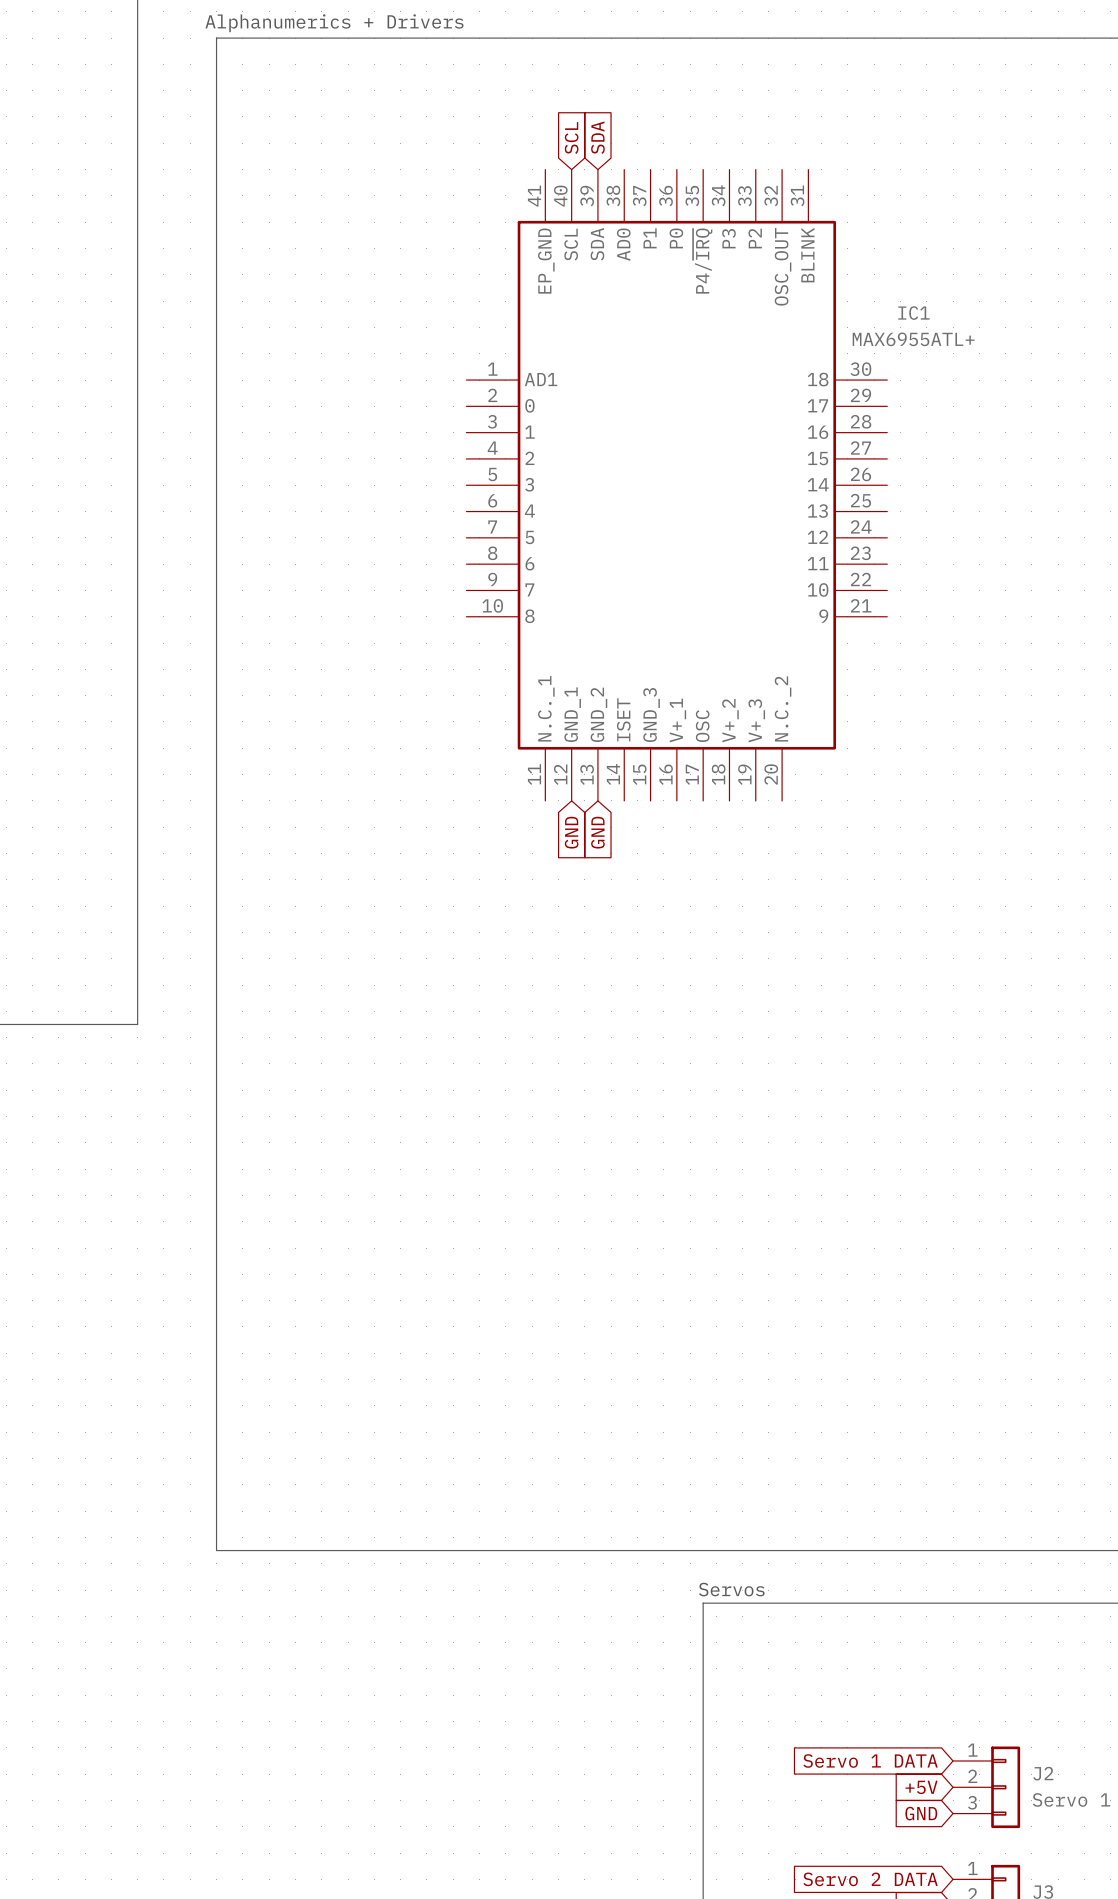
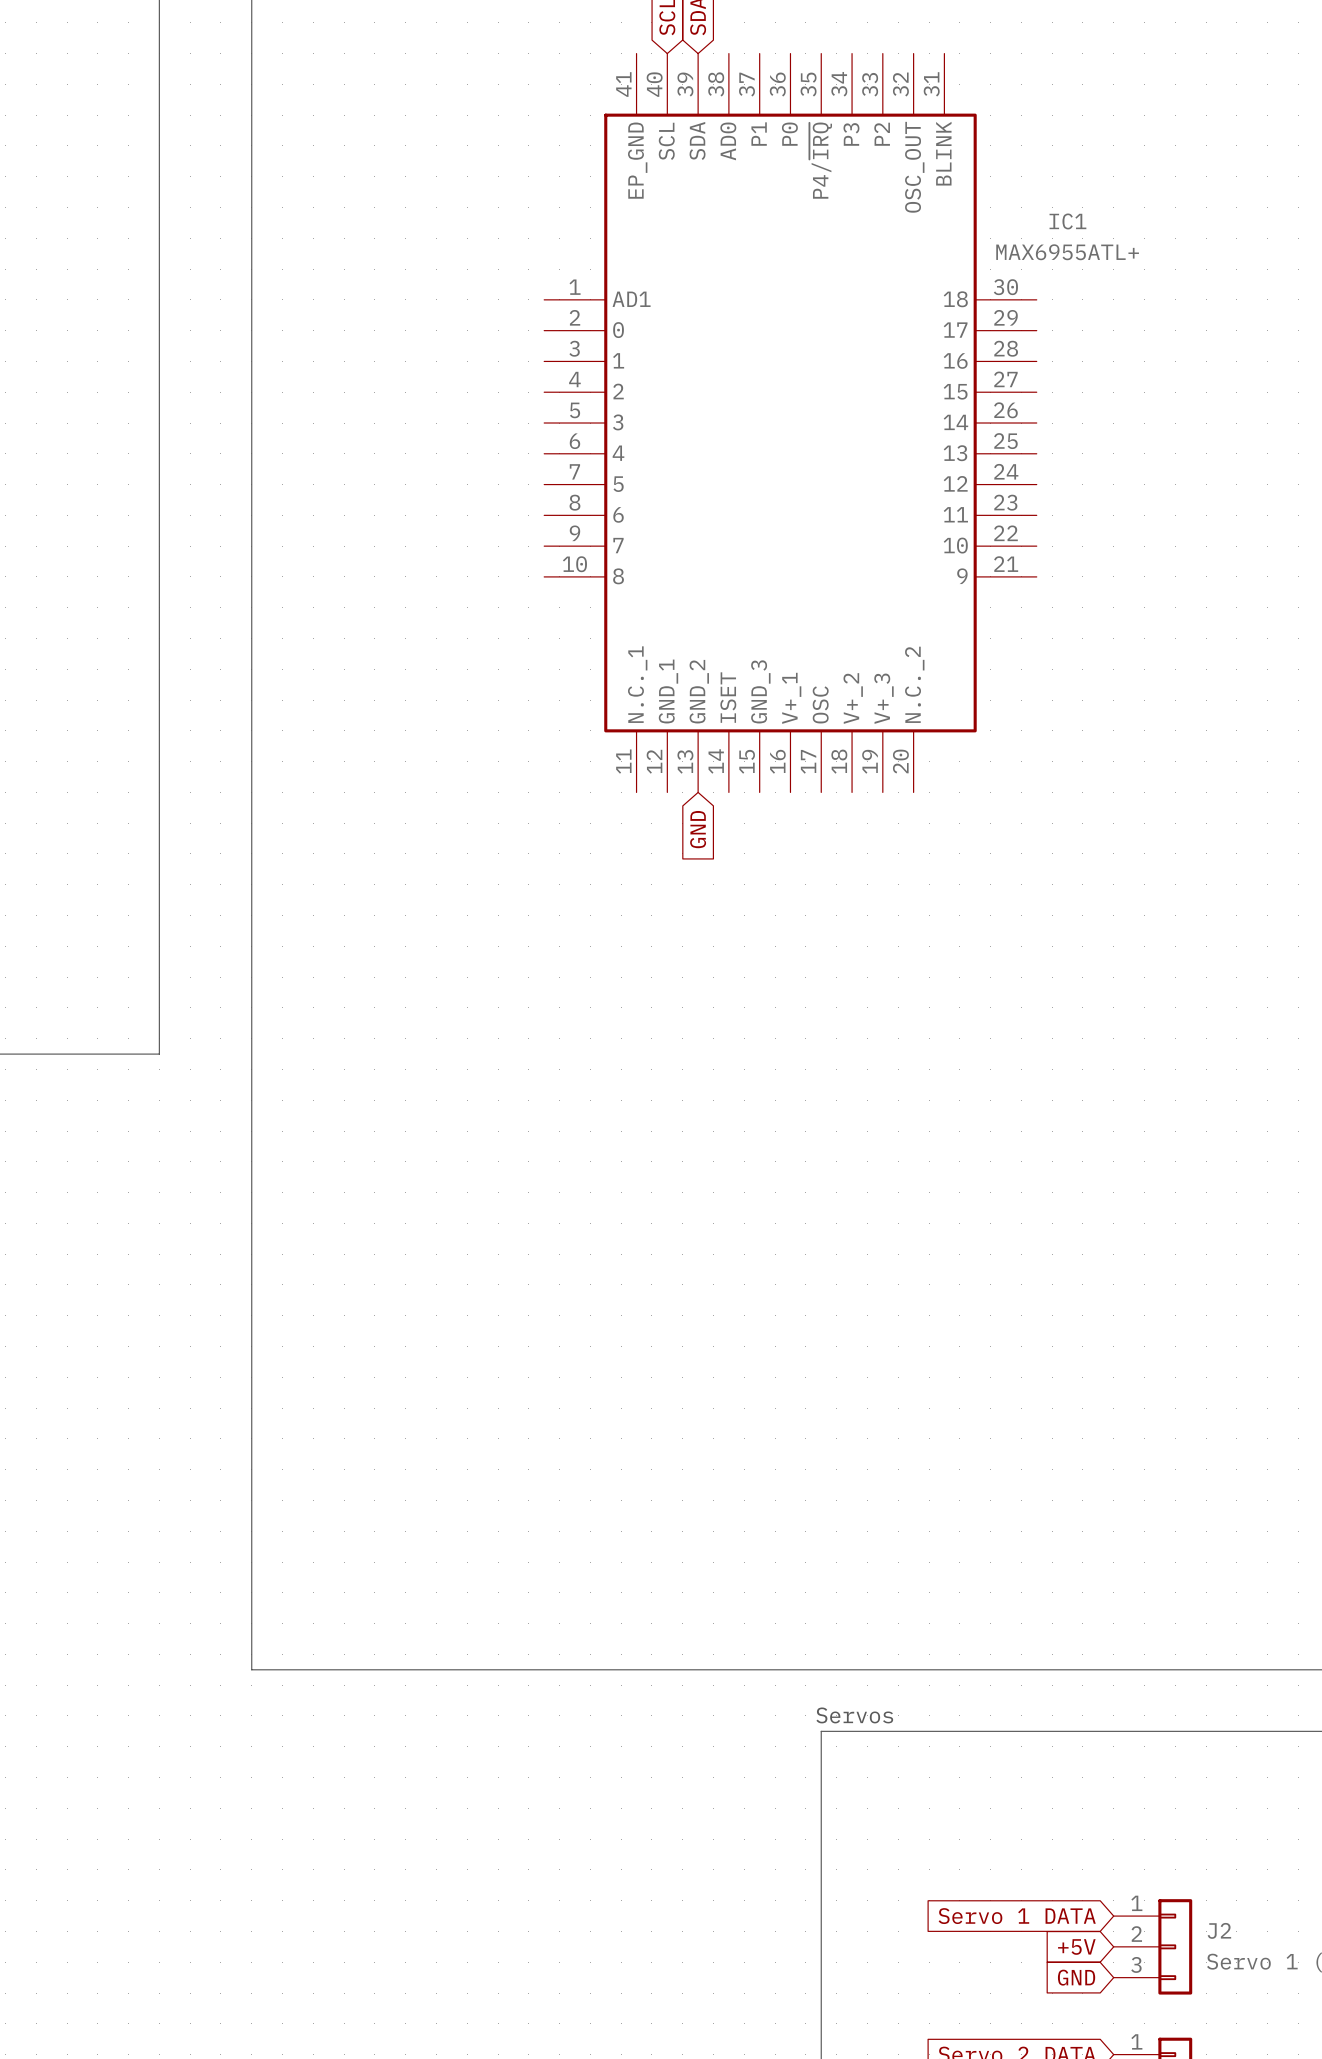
global label: GND (571, 832) -> none

